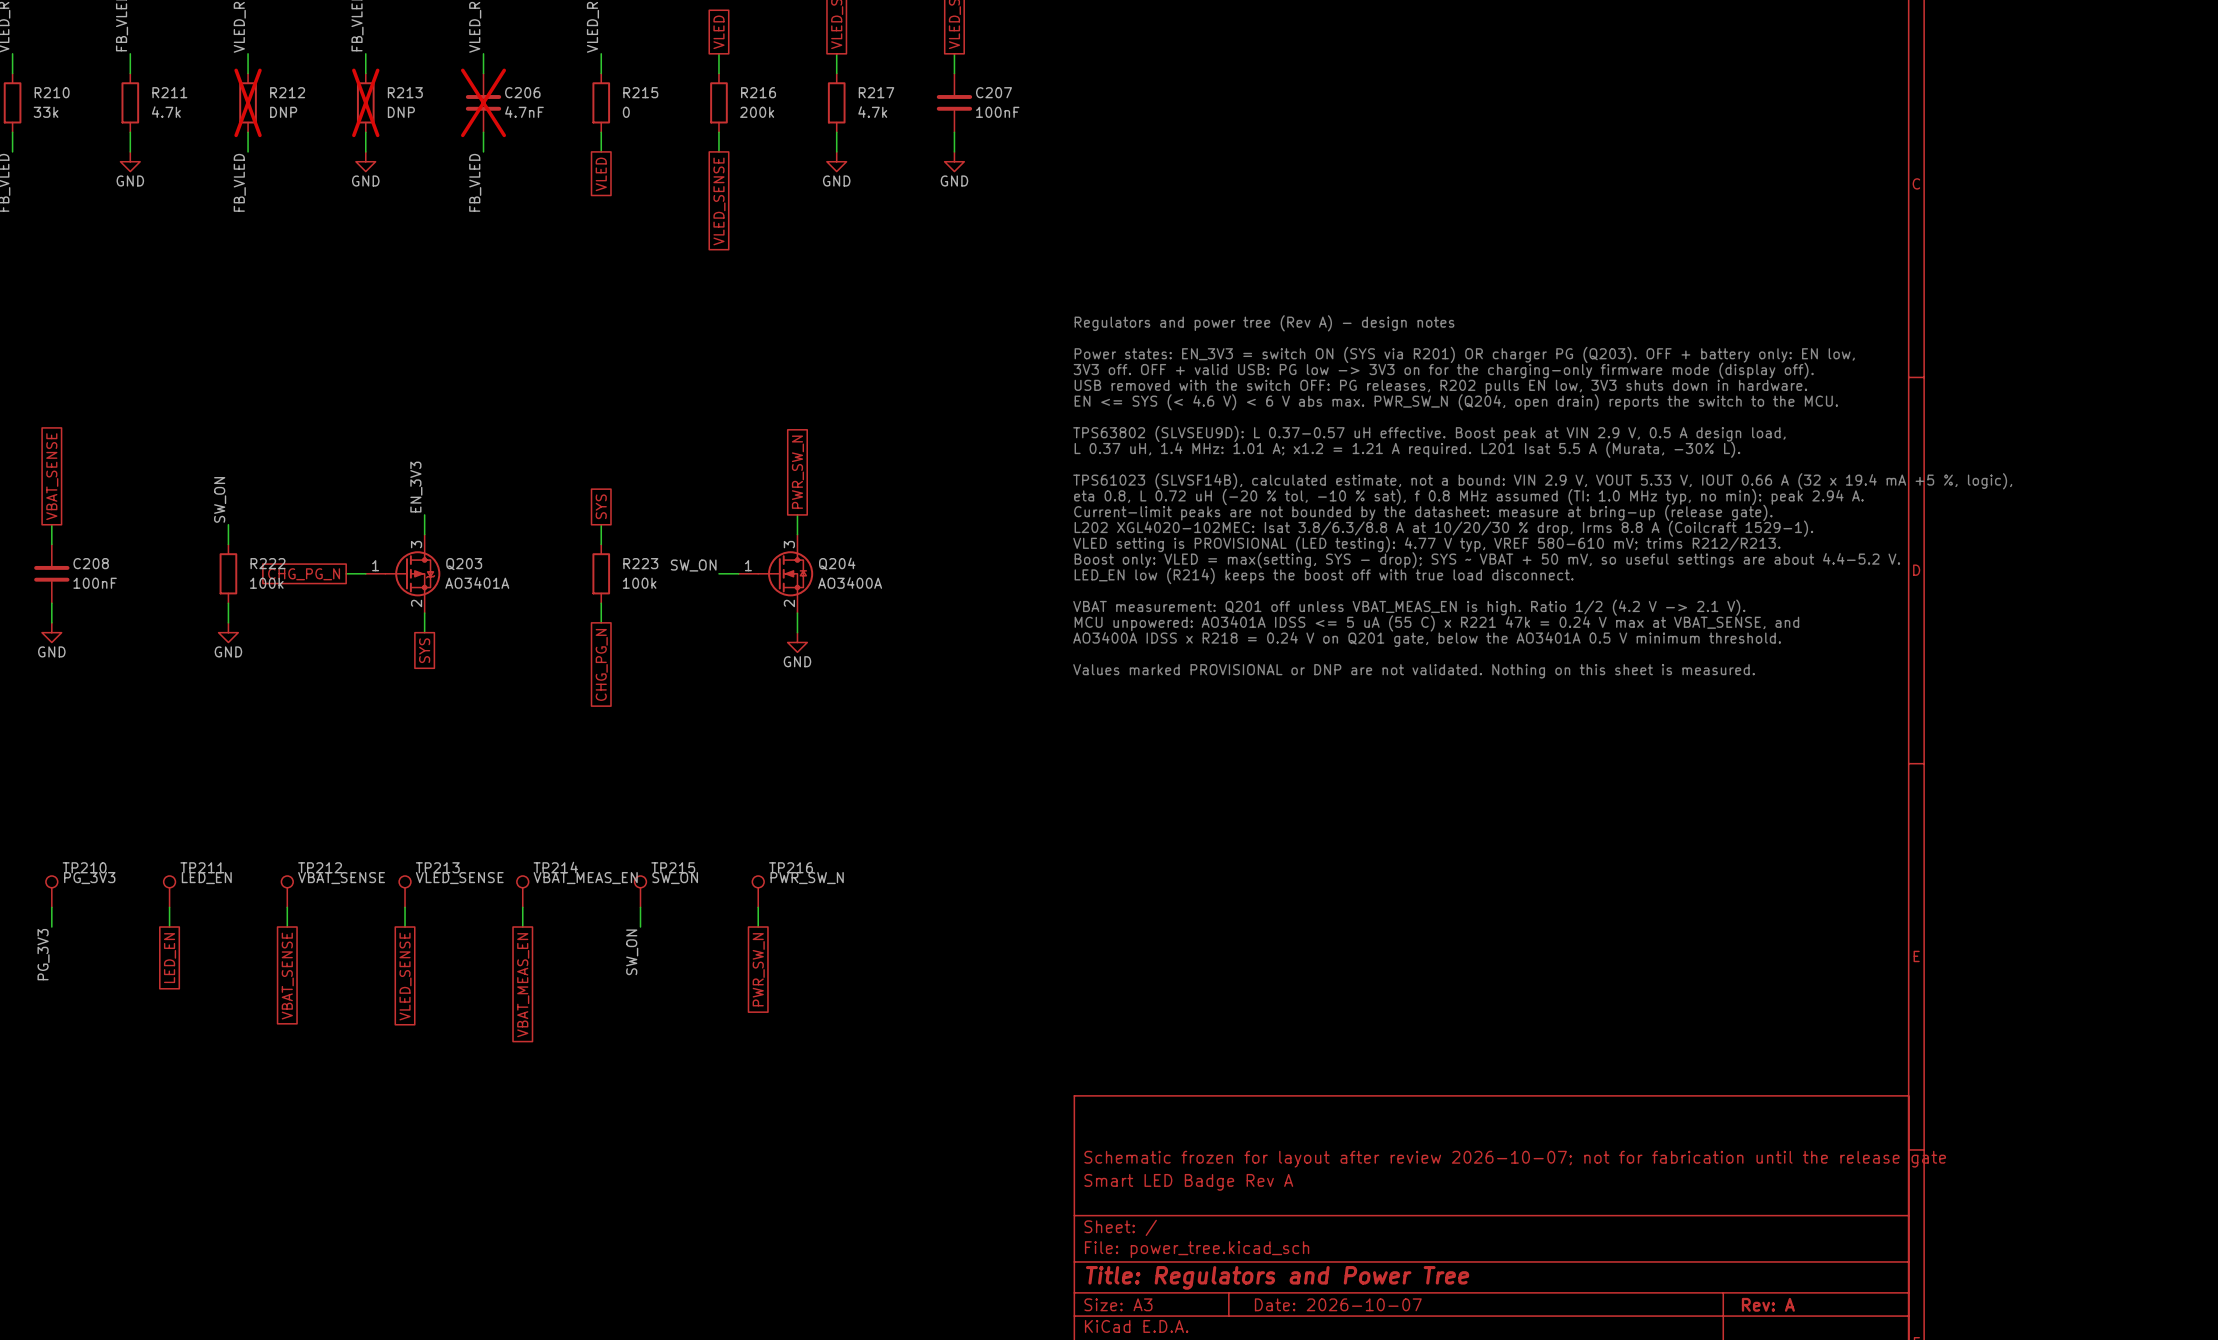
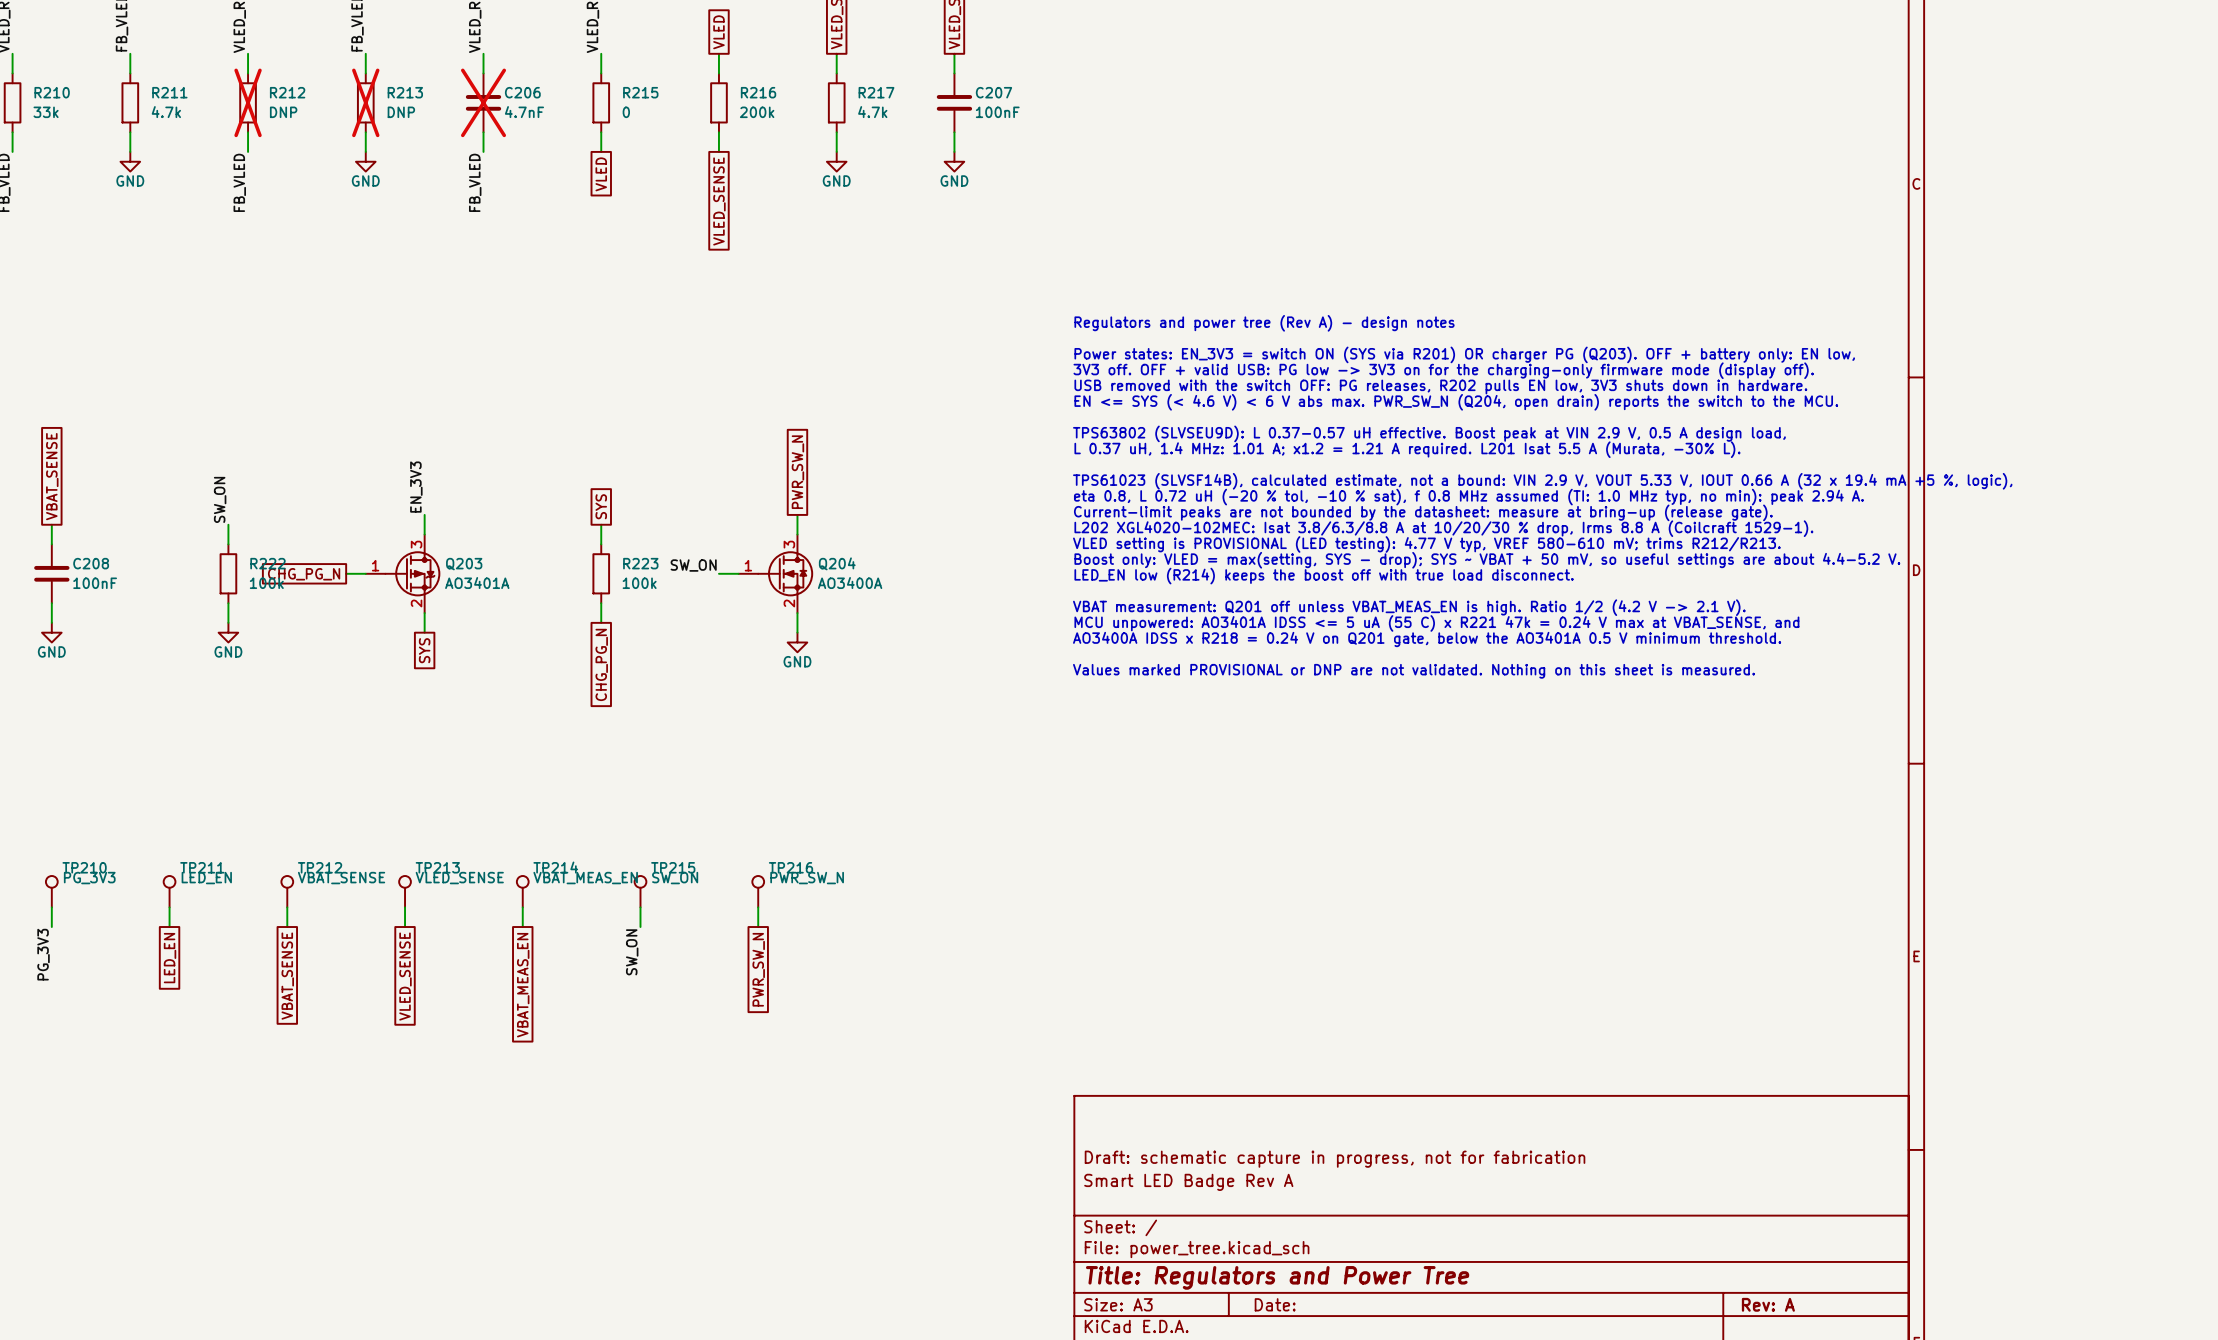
title block: Schematic frozen for layout after review 2026-10-07; not for fabrication until the release gate (1515, 1159) -> Draft: schematic capture in progress, not for fabrication (1335, 1159)
title block: Date: 2026-10-07 (1338, 1304) -> Date: (1275, 1304)

